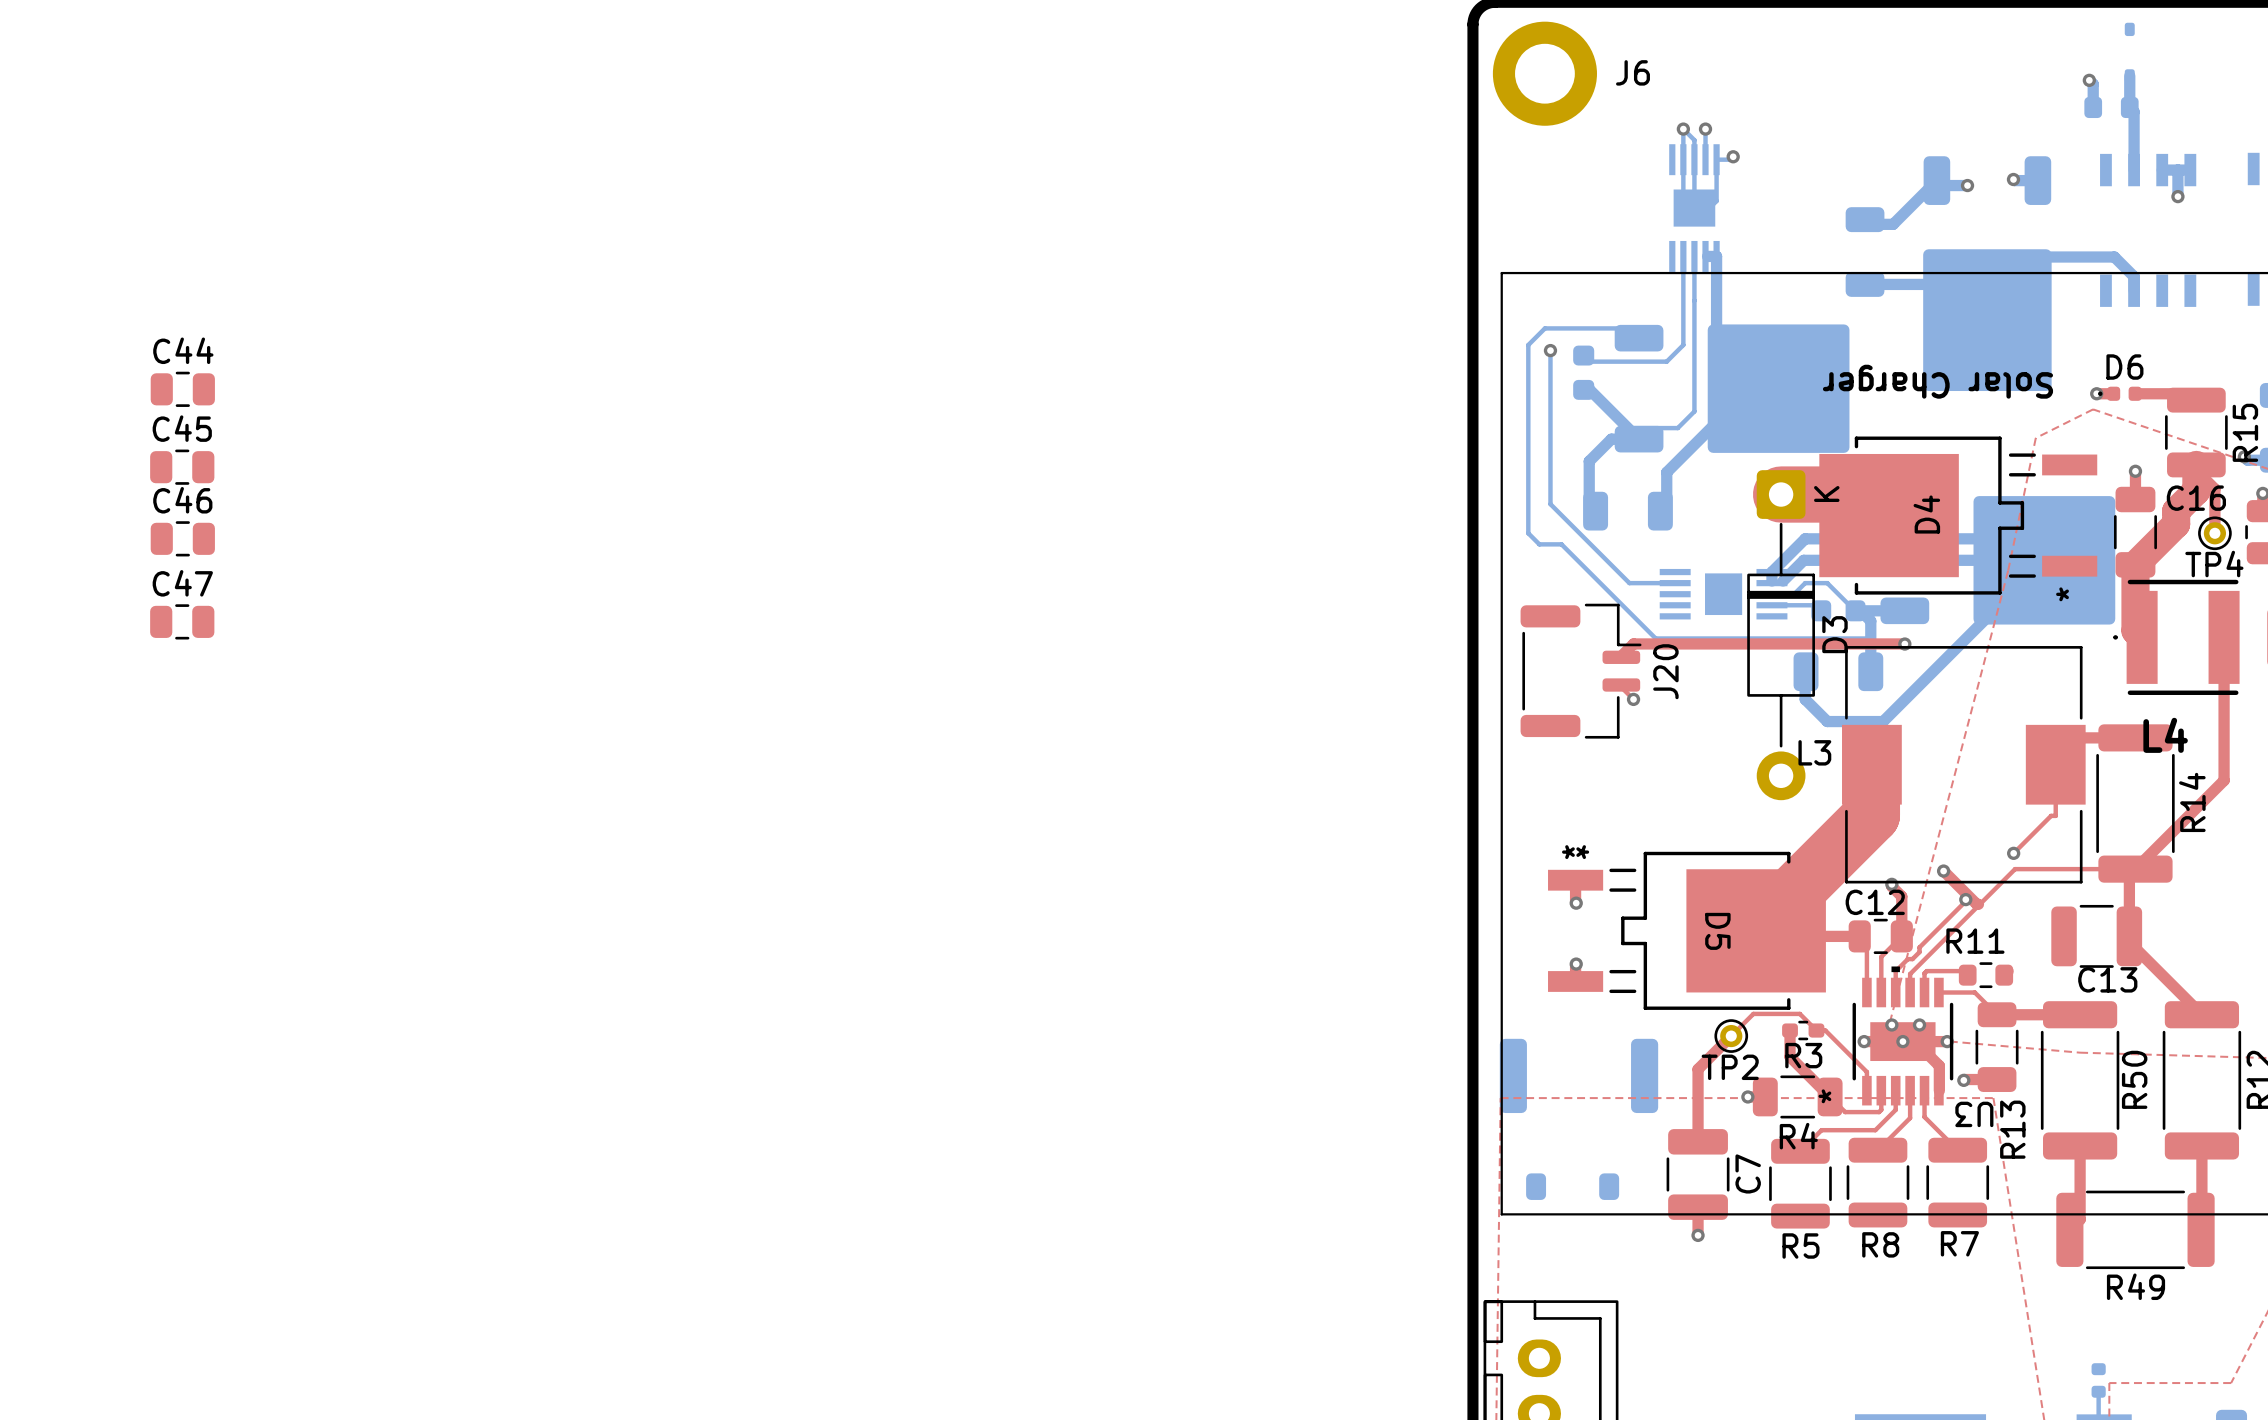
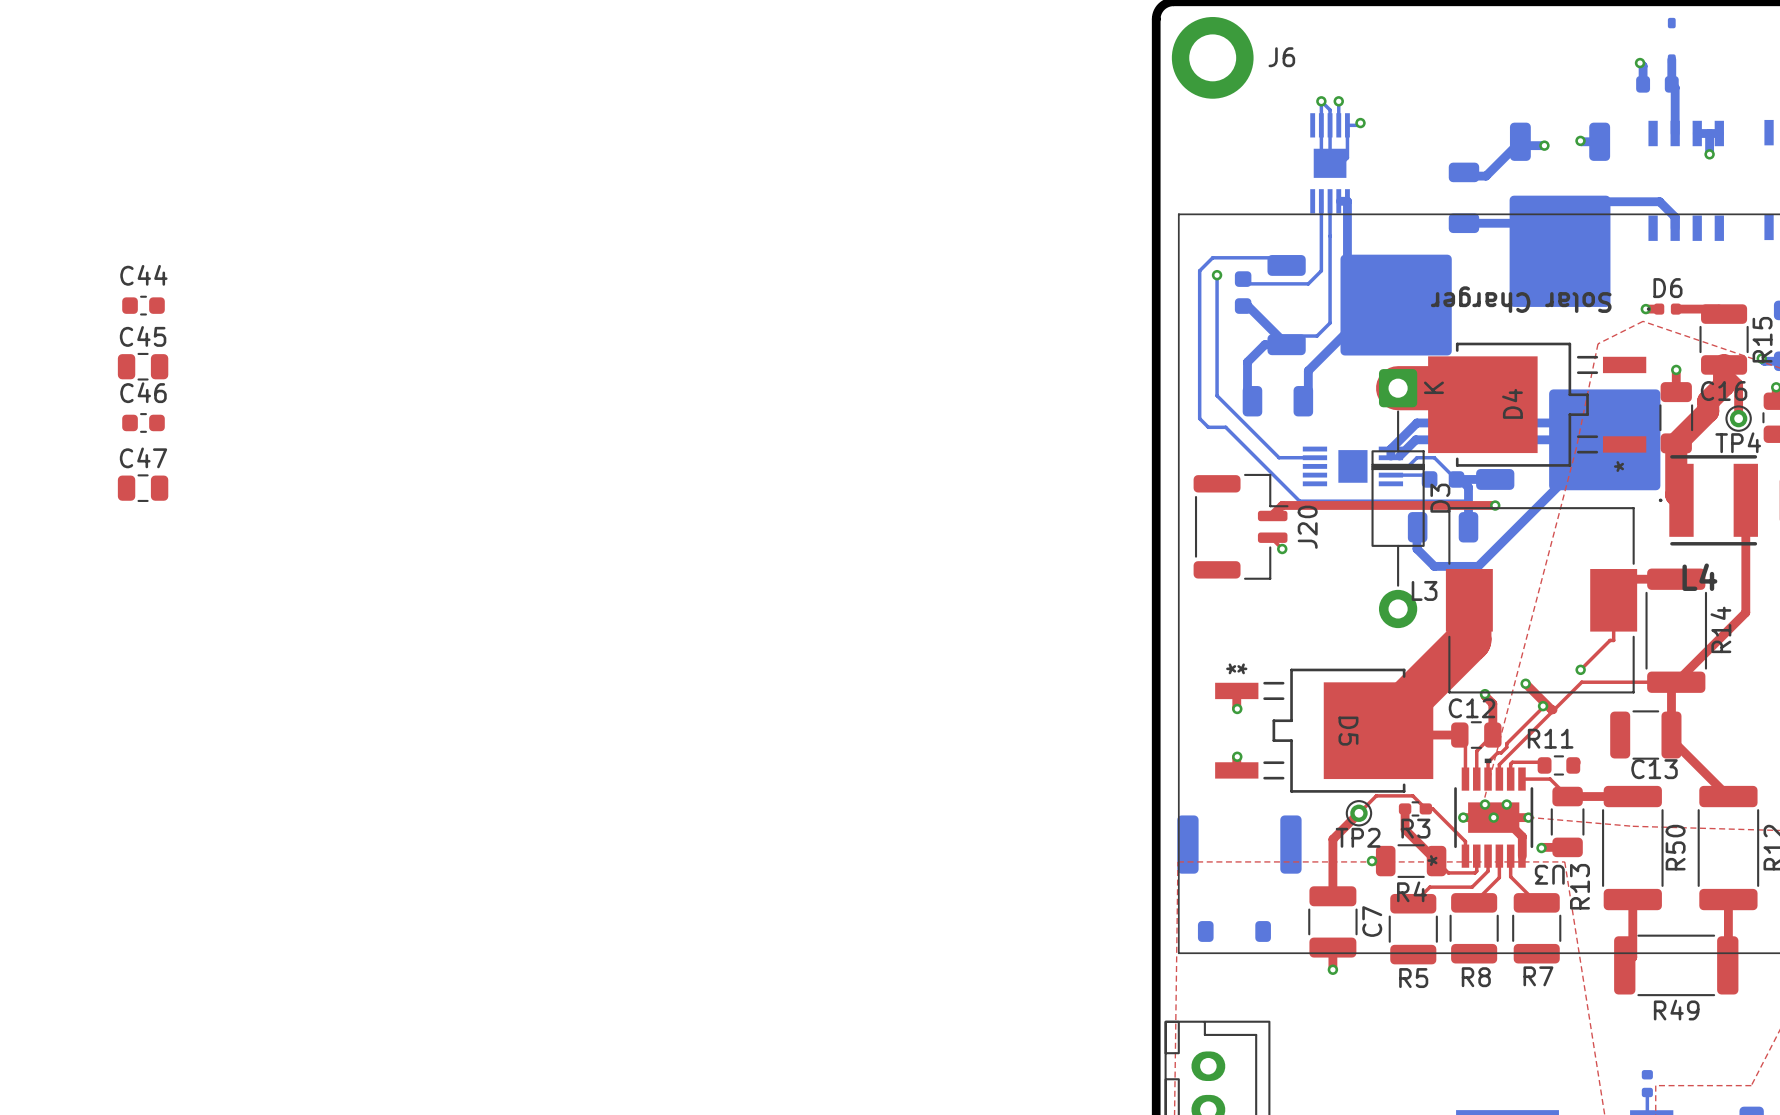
C44 footprint: [150, 371, 215, 407] -> [122, 295, 165, 316]
C46 footprint: [150, 521, 215, 557] -> [122, 413, 165, 433]

